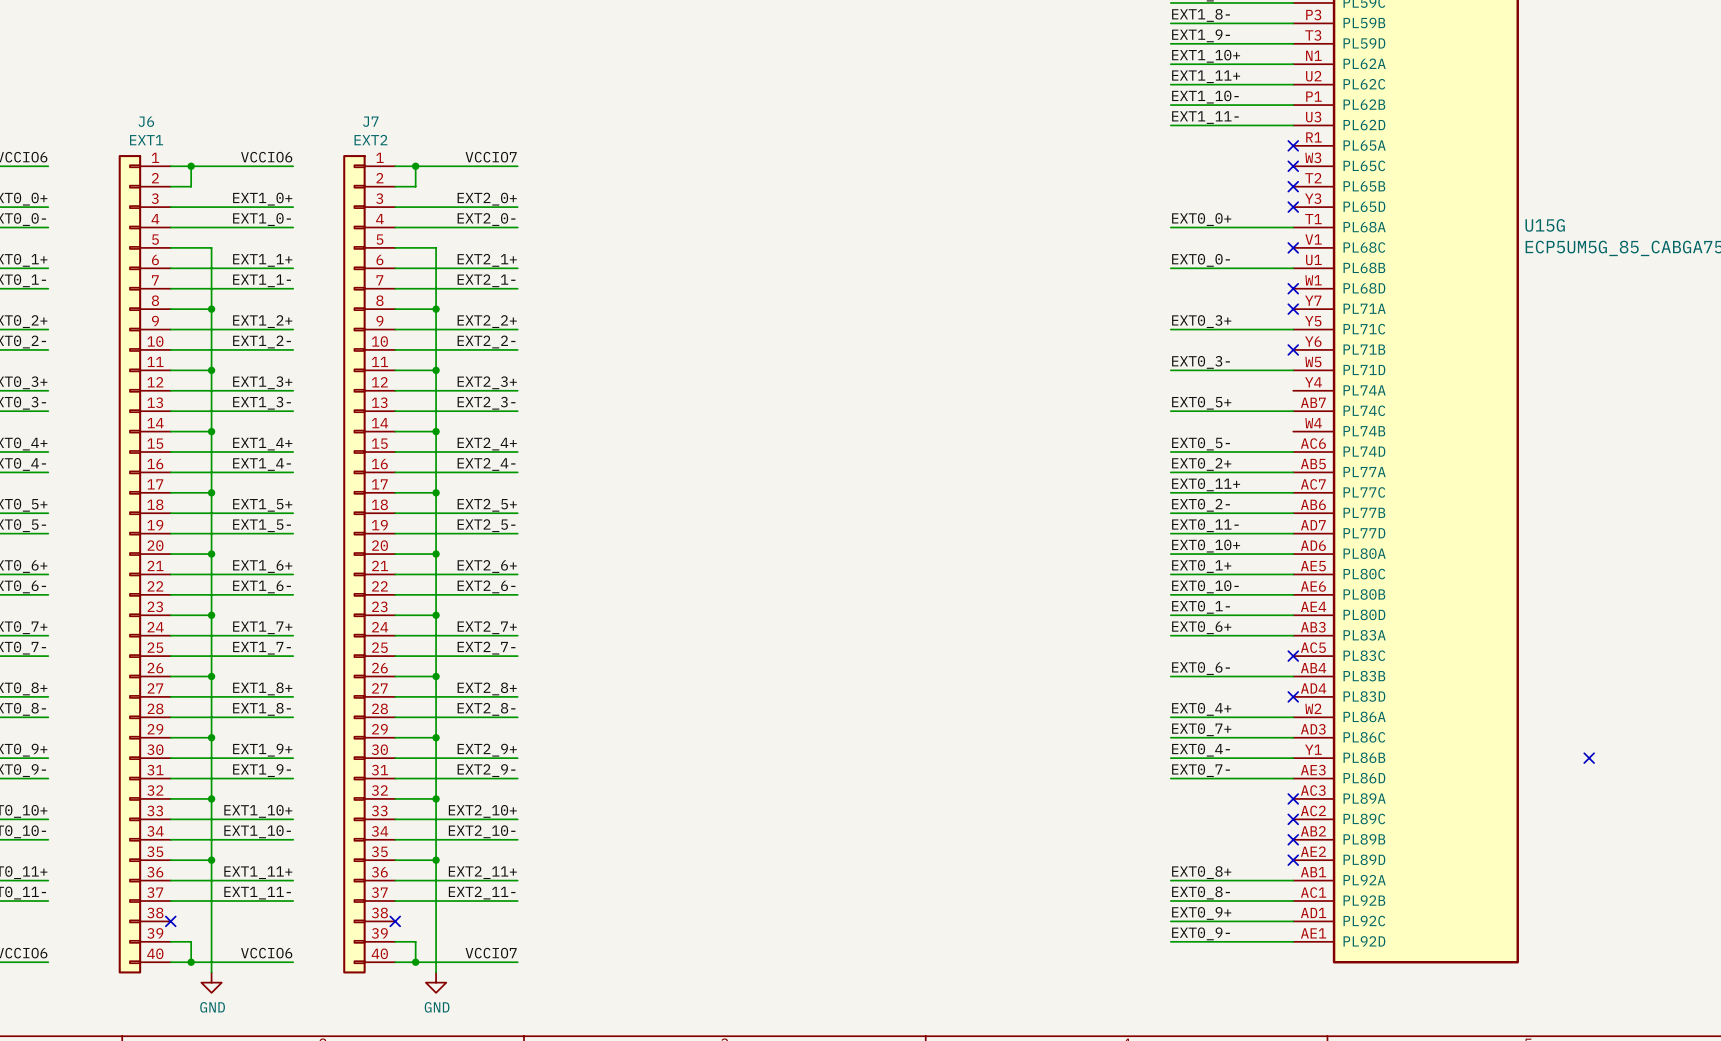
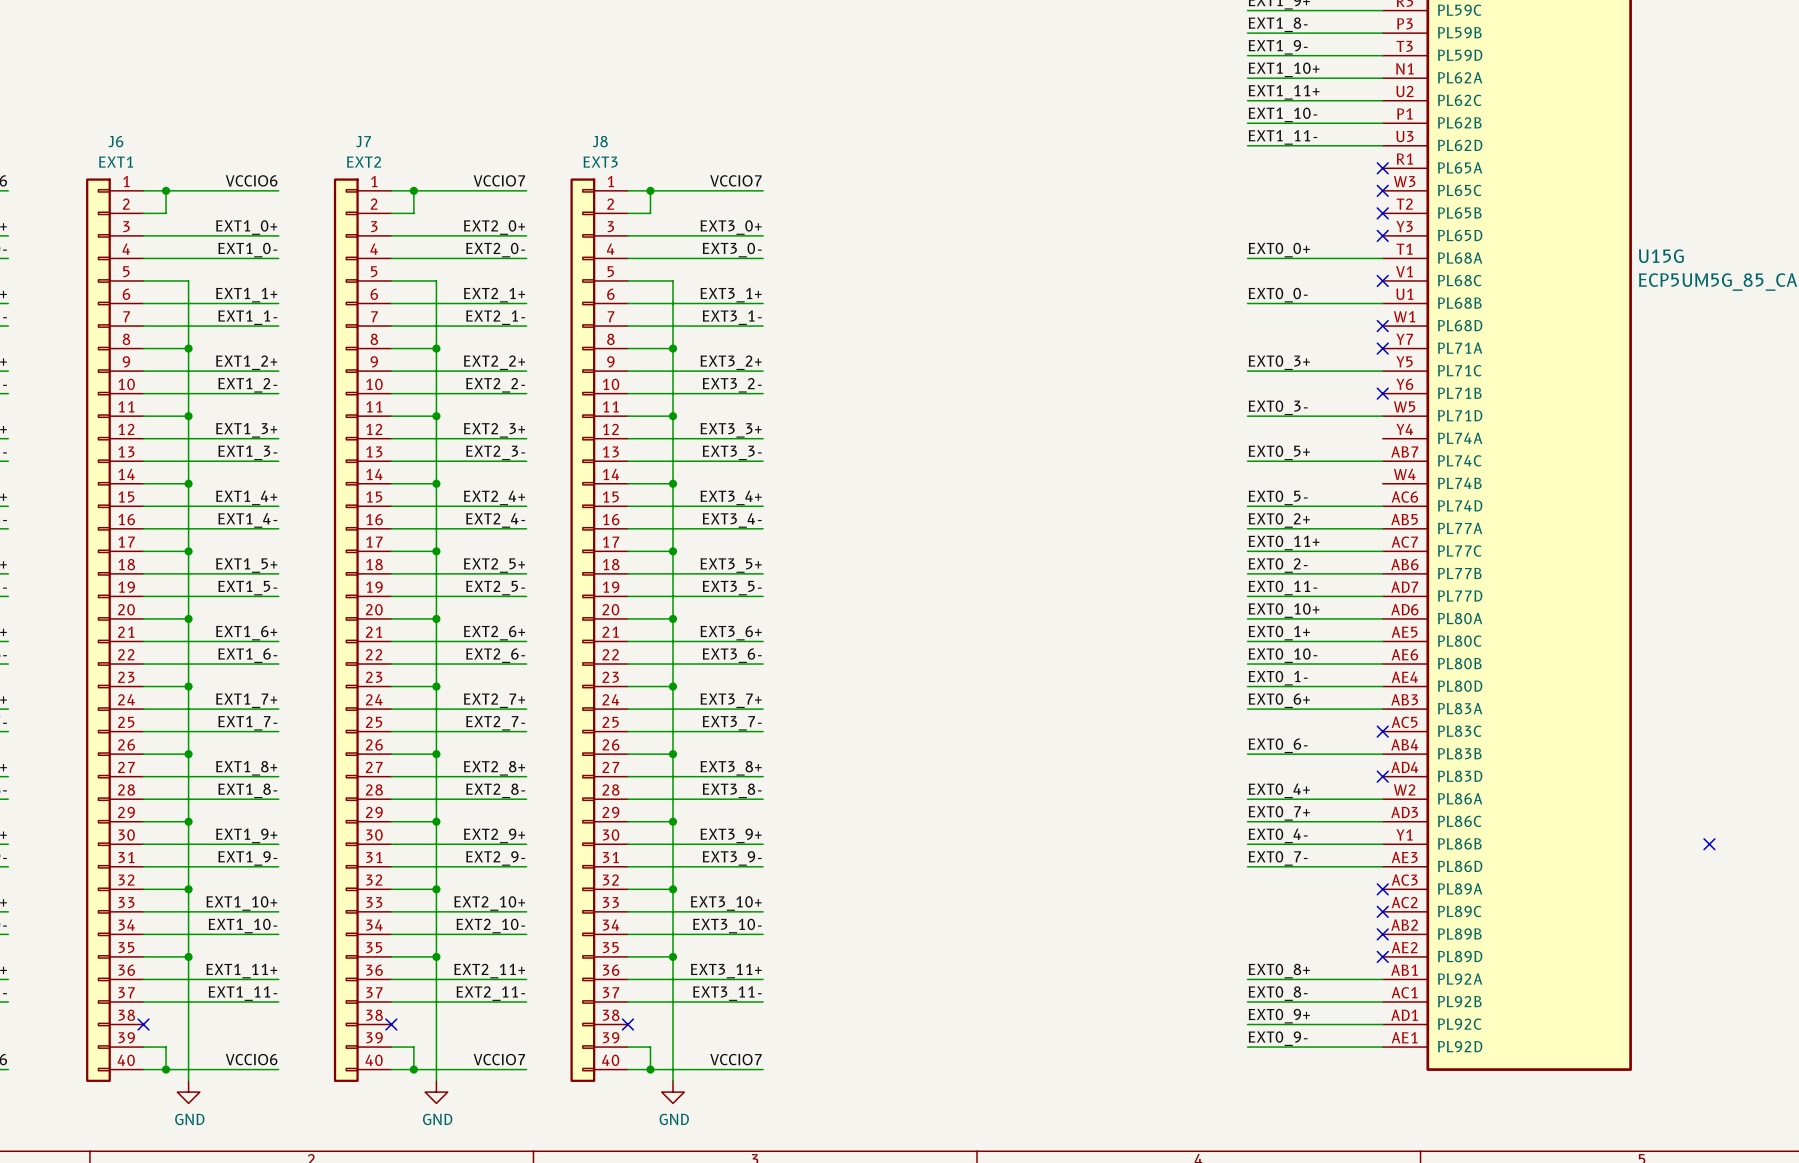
label: none -> VCCIO7 (735, 180)
wire: none -> (627, 190) (763, 190)
wire: none -> (650, 190) (650, 213) (627, 213)
junction: none -> (650, 190)
label: none -> EXT3_0+ (731, 227)
wire: none -> (627, 235) (763, 235)
label: none -> EXT3_0- (732, 250)
wire: none -> (627, 258) (763, 258)
wire: none -> (627, 280) (673, 280) (673, 1080)
label: none -> EXT3_1+ (731, 295)
wire: none -> (627, 303) (763, 303)
label: none -> EXT3_1- (732, 317)
wire: none -> (627, 326) (763, 326)
wire: none -> (627, 348) (673, 348)
junction: none -> (673, 348)
label: none -> EXT3_2+ (731, 362)
wire: none -> (627, 371) (763, 371)
label: none -> EXT3_2- (732, 385)
wire: none -> (627, 393) (763, 393)
wire: none -> (627, 416) (673, 416)
junction: none -> (673, 416)
label: none -> EXT3_3+ (731, 430)
wire: none -> (627, 438) (763, 438)
label: none -> EXT3_3- (732, 452)
wire: none -> (627, 461) (763, 461)
wire: none -> (627, 483) (673, 483)
junction: none -> (673, 483)
label: none -> EXT3_4+ (731, 497)
wire: none -> (627, 506) (763, 506)
label: none -> EXT3_4- (732, 520)
wire: none -> (627, 528) (763, 528)
wire: none -> (627, 551) (673, 551)
junction: none -> (673, 551)
label: none -> EXT3_5+ (731, 565)
wire: none -> (627, 573) (763, 573)
label: none -> EXT3_5- (732, 588)
wire: none -> (627, 596) (763, 596)
wire: none -> (627, 618) (673, 618)
junction: none -> (673, 618)
J8: none -> EXT3 (599, 630)
label: none -> EXT3_6+ (731, 633)
wire: none -> (627, 641) (763, 641)
label: none -> EXT3_6- (732, 655)
wire: none -> (627, 664) (763, 664)
wire: none -> (627, 686) (673, 686)
junction: none -> (673, 686)
label: none -> EXT3_7+ (731, 700)
wire: none -> (627, 709) (763, 709)
label: none -> EXT3_7- (732, 723)
wire: none -> (627, 731) (763, 731)
wire: none -> (627, 754) (673, 754)
junction: none -> (673, 754)
label: none -> EXT3_8+ (731, 768)
wire: none -> (627, 776) (763, 776)
label: none -> EXT3_8- (732, 790)
wire: none -> (627, 799) (763, 799)
wire: none -> (627, 821) (673, 821)
junction: none -> (673, 821)
label: none -> EXT3_9+ (731, 835)
wire: none -> (627, 844) (763, 844)
label: none -> EXT3_9- (732, 858)
wire: none -> (627, 866) (763, 866)
wire: none -> (627, 889) (673, 889)
junction: none -> (673, 889)
label: none -> EXT3_10+ (726, 903)
wire: none -> (627, 911) (763, 911)
label: none -> EXT3_10- (727, 926)
wire: none -> (627, 934) (763, 934)
wire: none -> (627, 956) (673, 956)
junction: none -> (673, 956)
label: none -> EXT3_11+ (726, 971)
wire: none -> (627, 979) (763, 979)
label: none -> EXT3_11- (727, 993)
wire: none -> (627, 1001) (763, 1001)
no-connect mark: none -> (627, 1024)
wire: none -> (627, 1047) (650, 1047) (650, 1069)
label: none -> VCCIO7 (735, 1059)
wire: none -> (627, 1069) (763, 1069)
junction: none -> (650, 1069)
power symbol: none -> GND (673, 1092)

